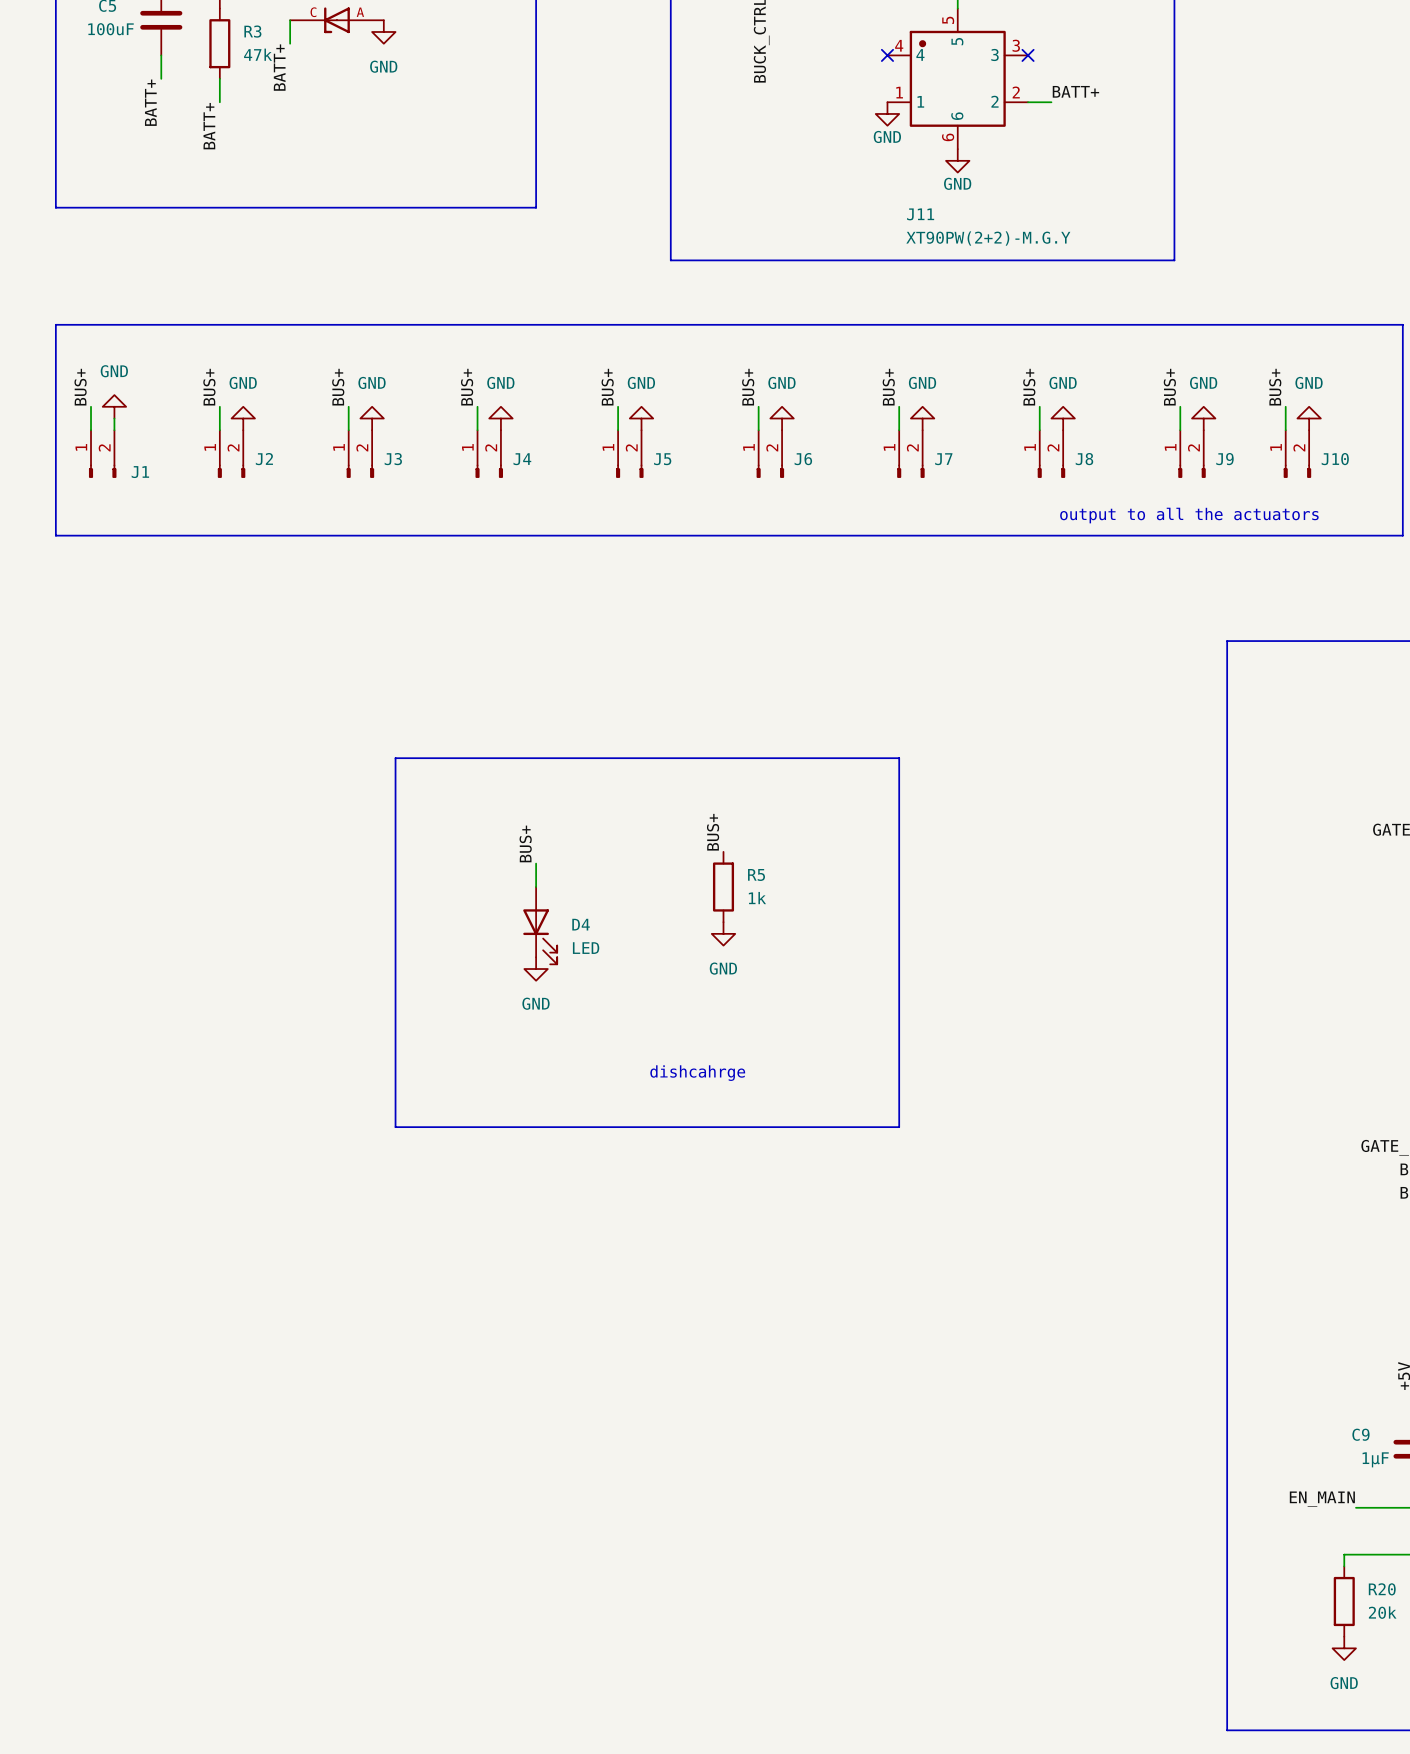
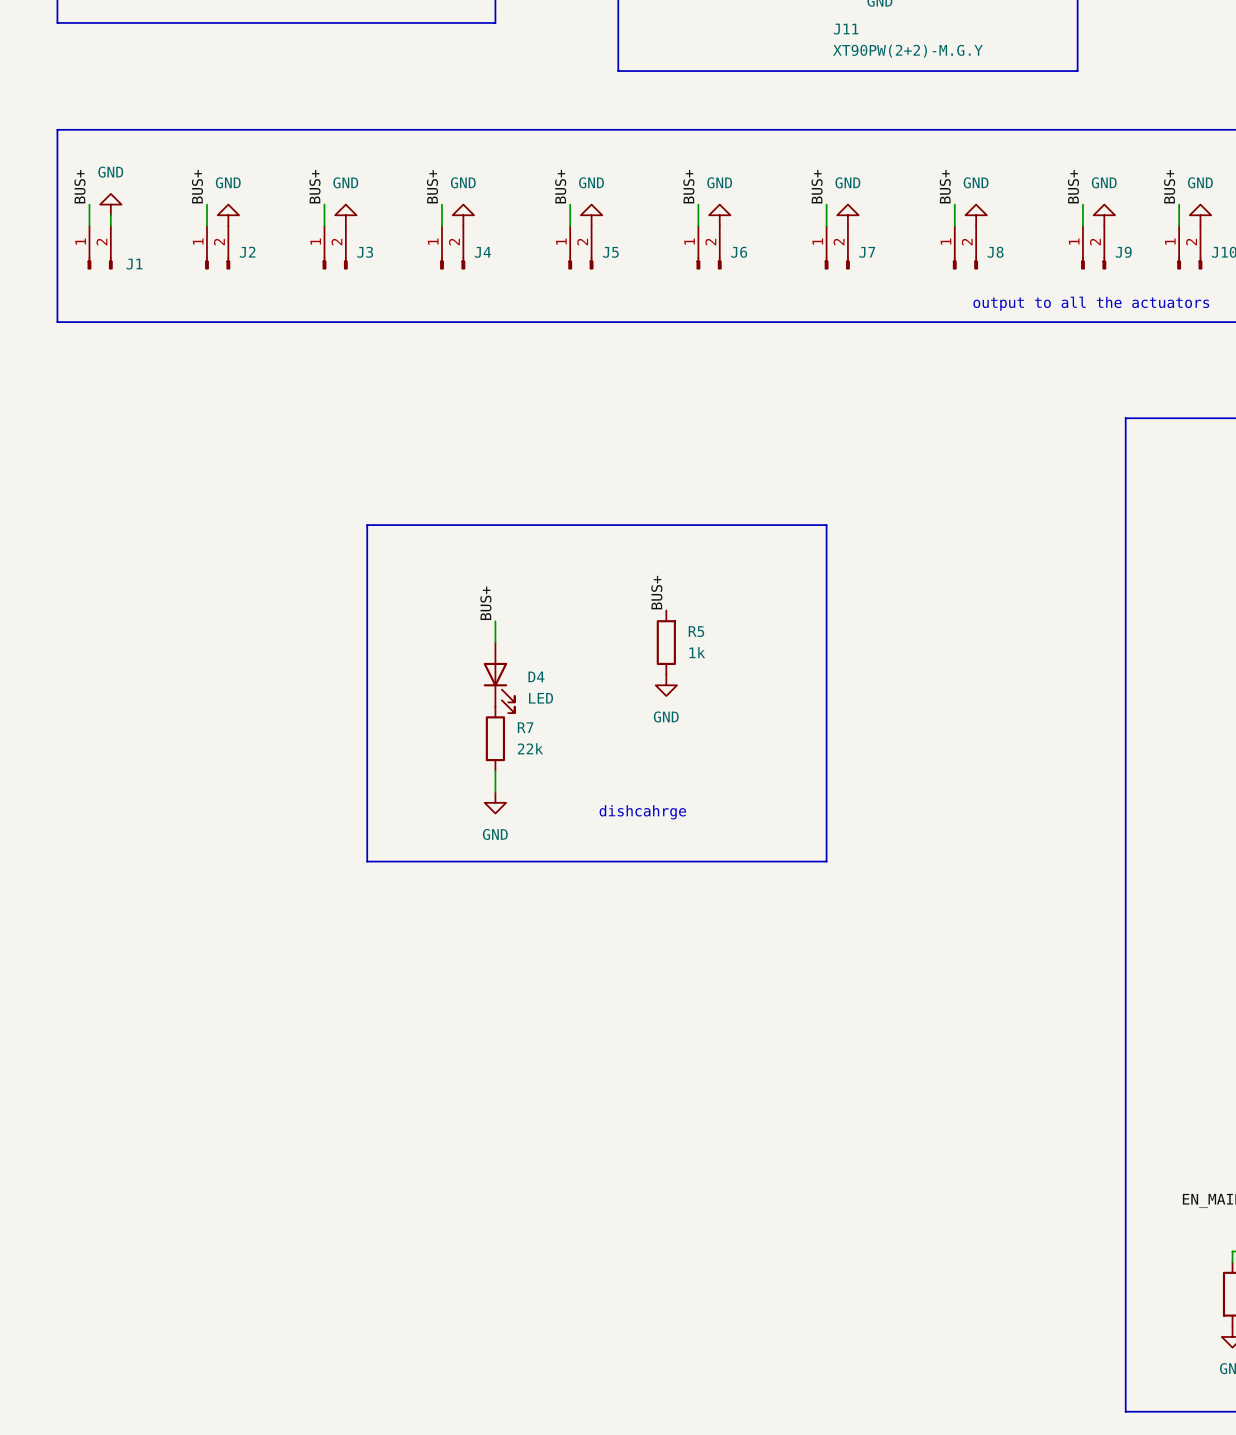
power symbol position: GND (536, 969) -> GND (495, 802)
R7: none -> 22k (495, 738)
wire: none -> (495, 770) (495, 792)

